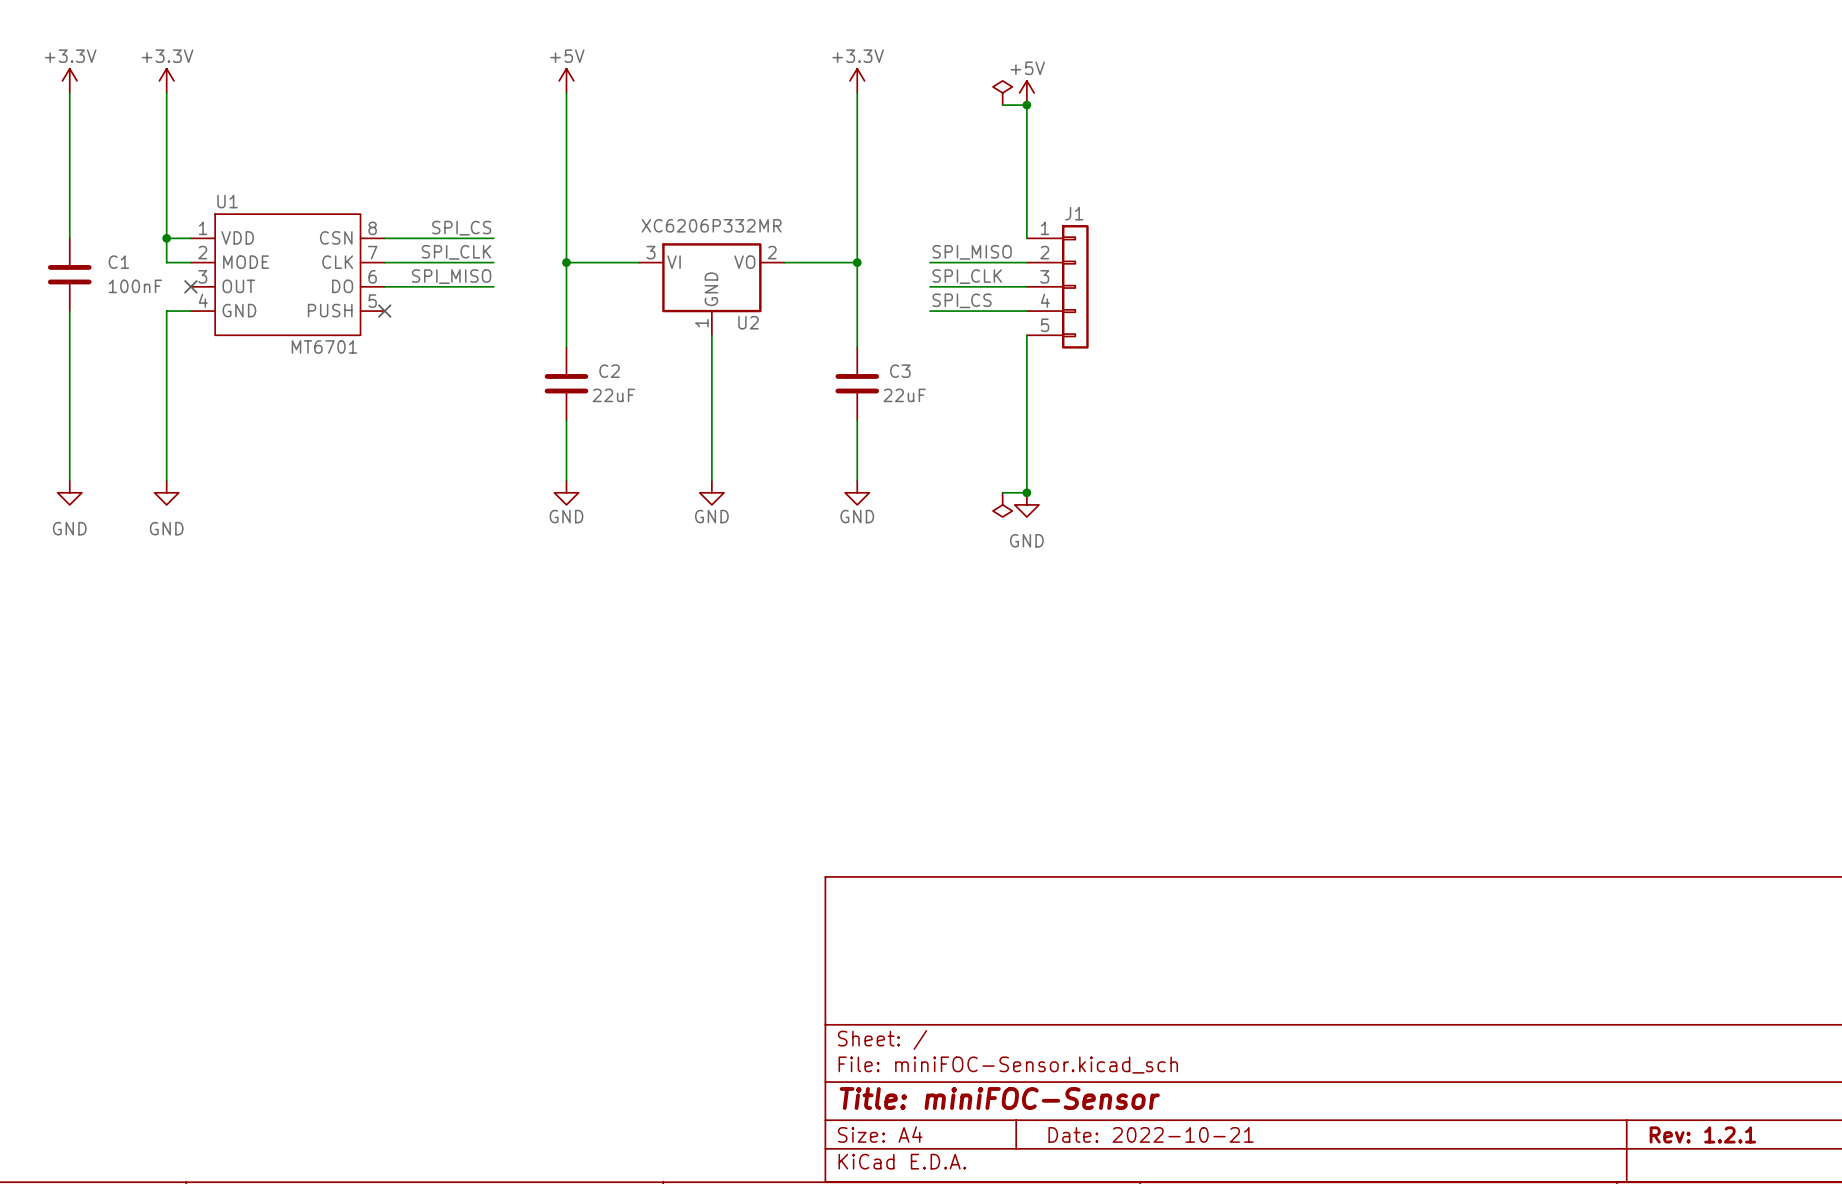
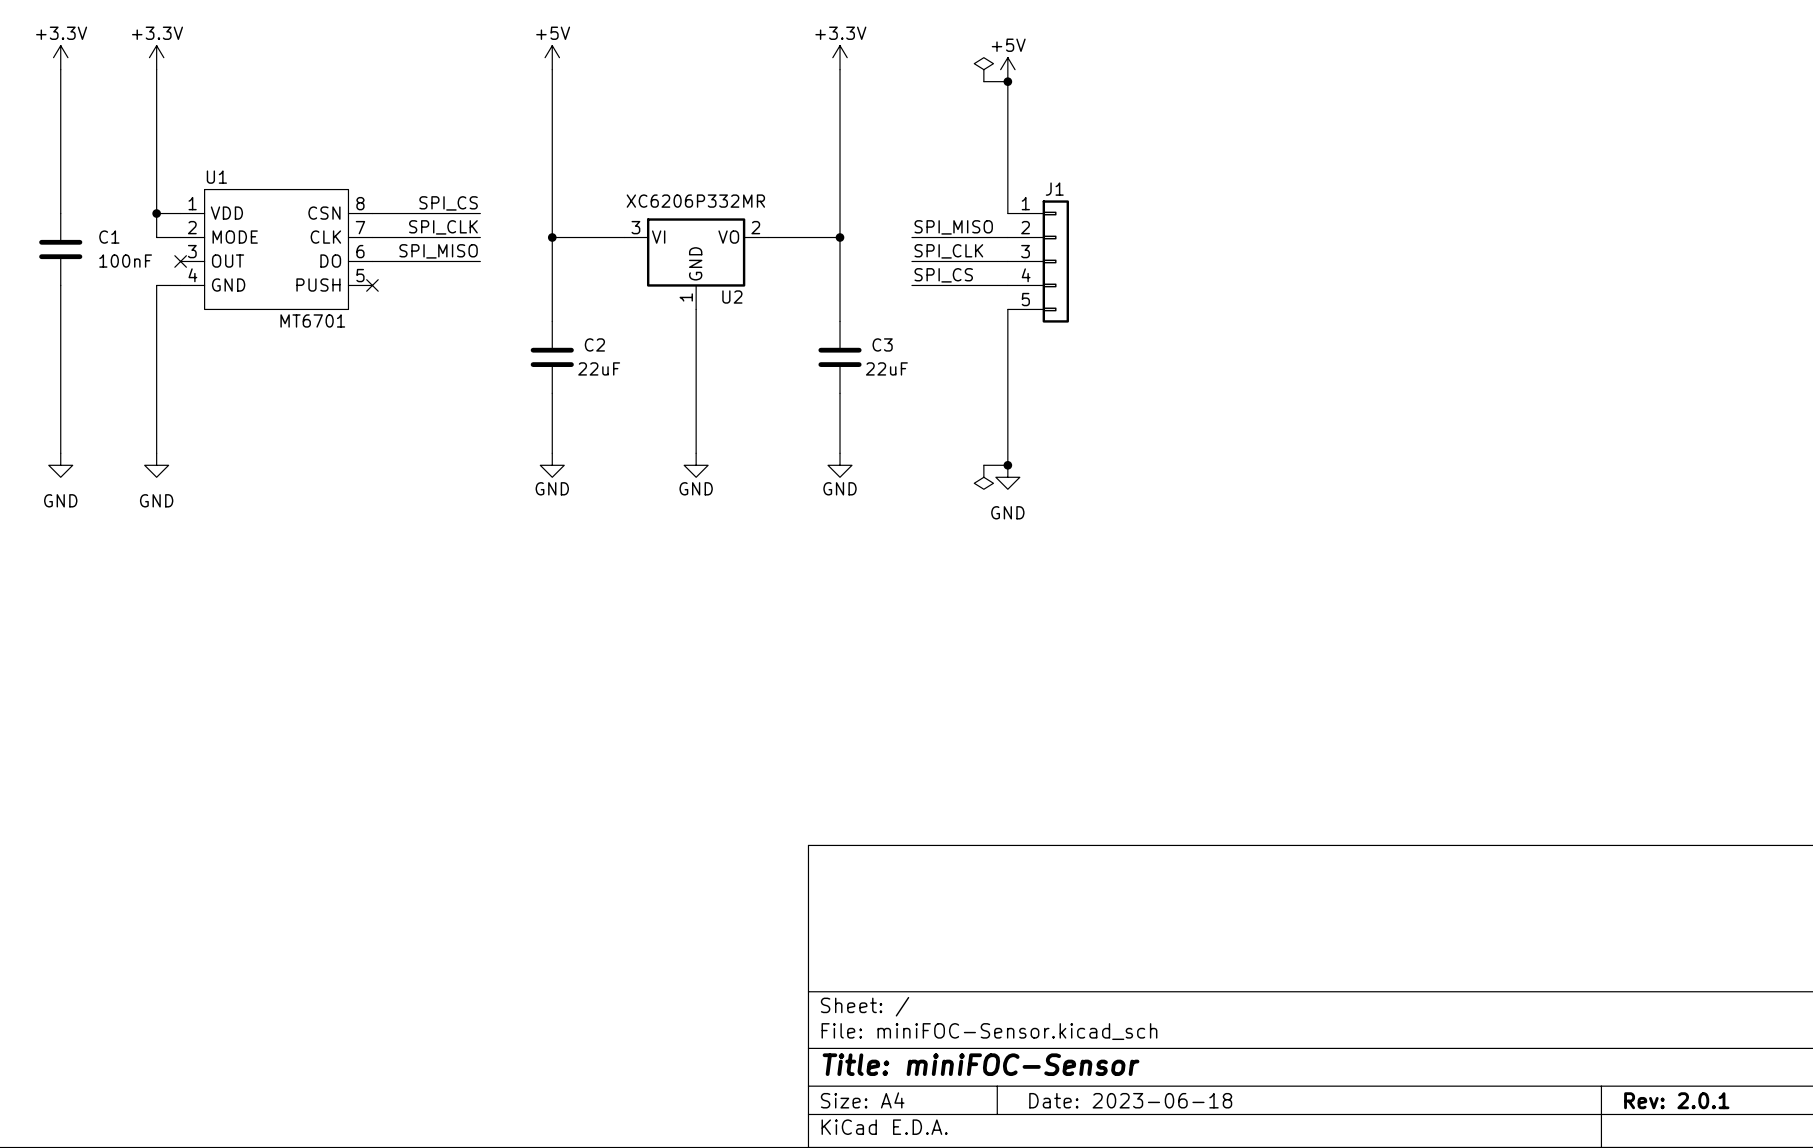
title block: Date: 2022-10-21 (1151, 1134) -> Date: 2023-06-18 (1130, 1100)
title block: Rev: 1.2.1 (1702, 1134) -> Rev: 2.0.1 (1676, 1100)

